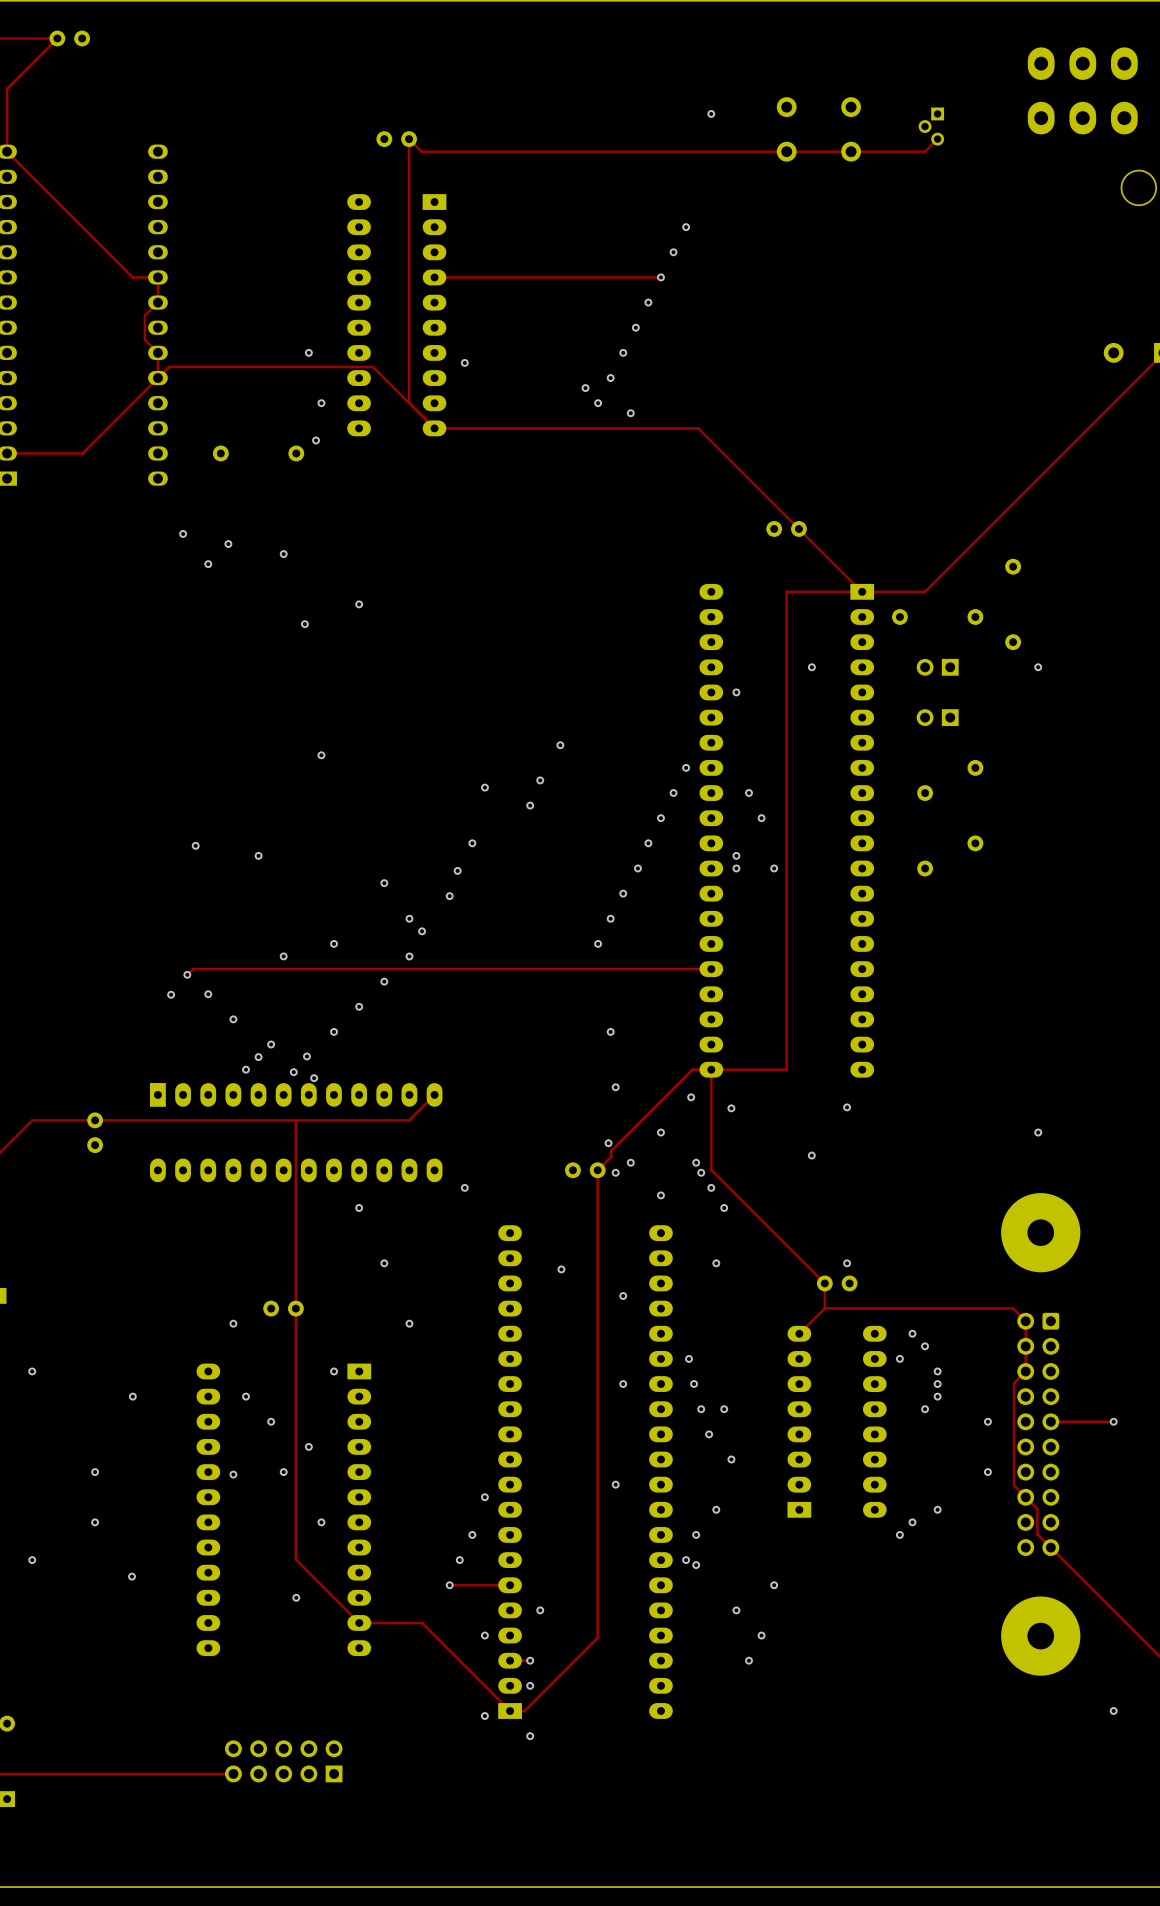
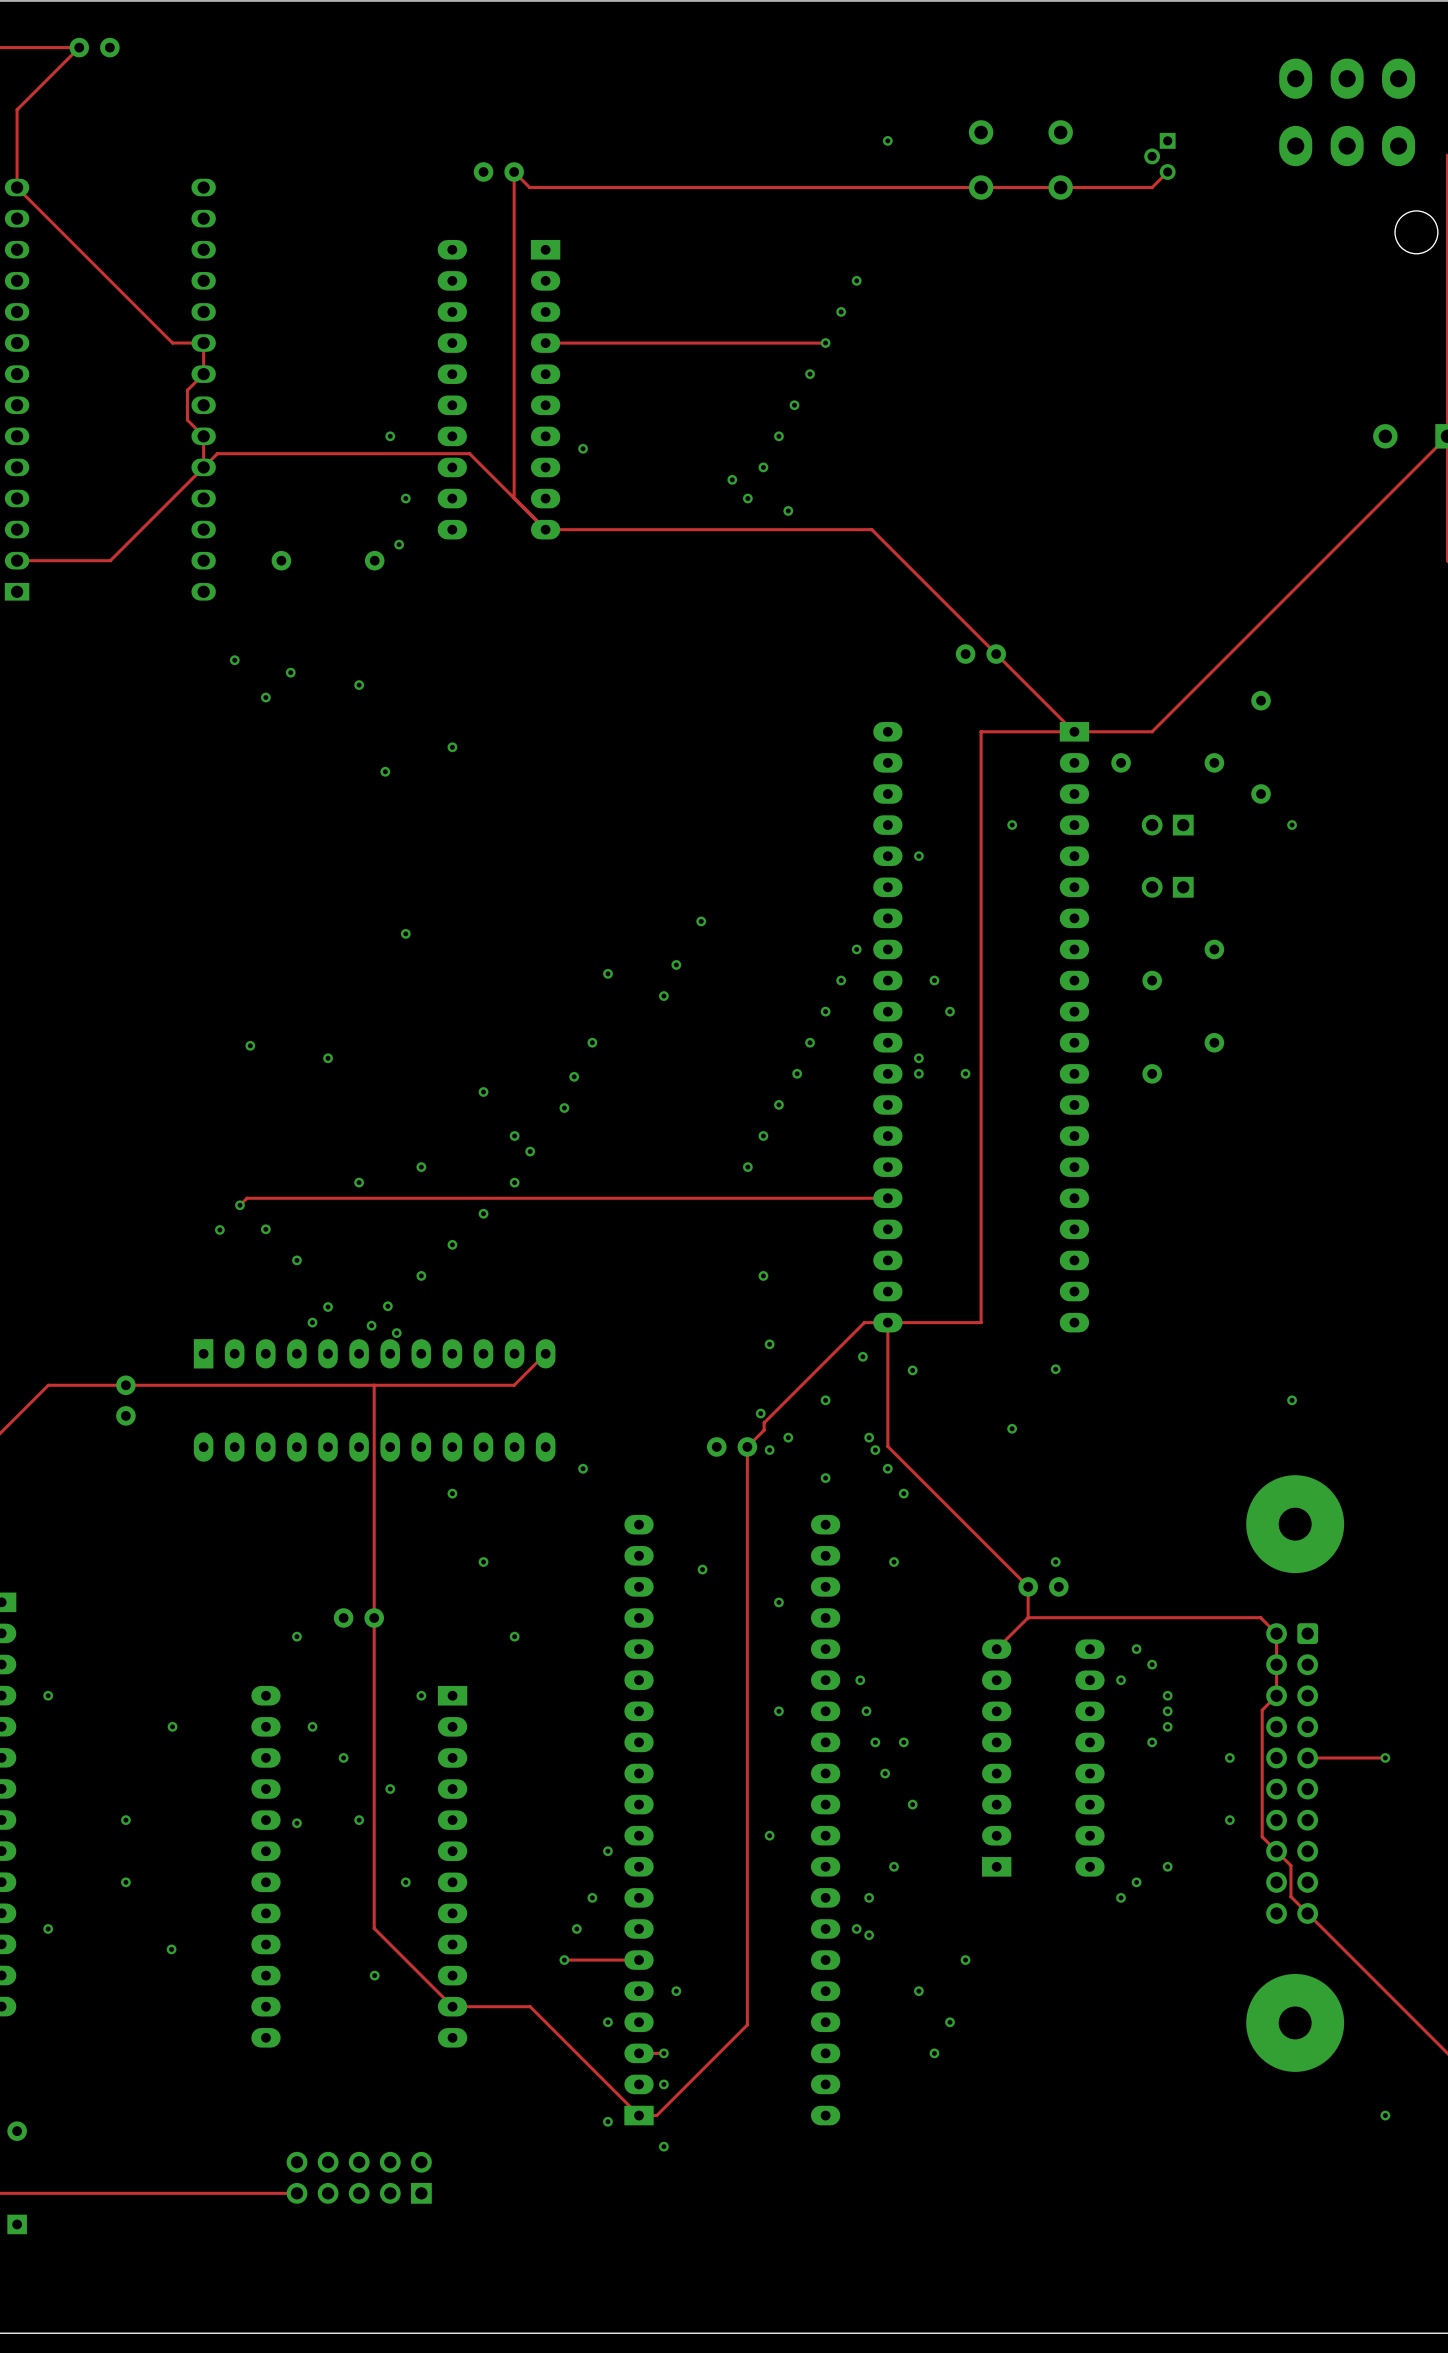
via: (271, 1044) -> none

